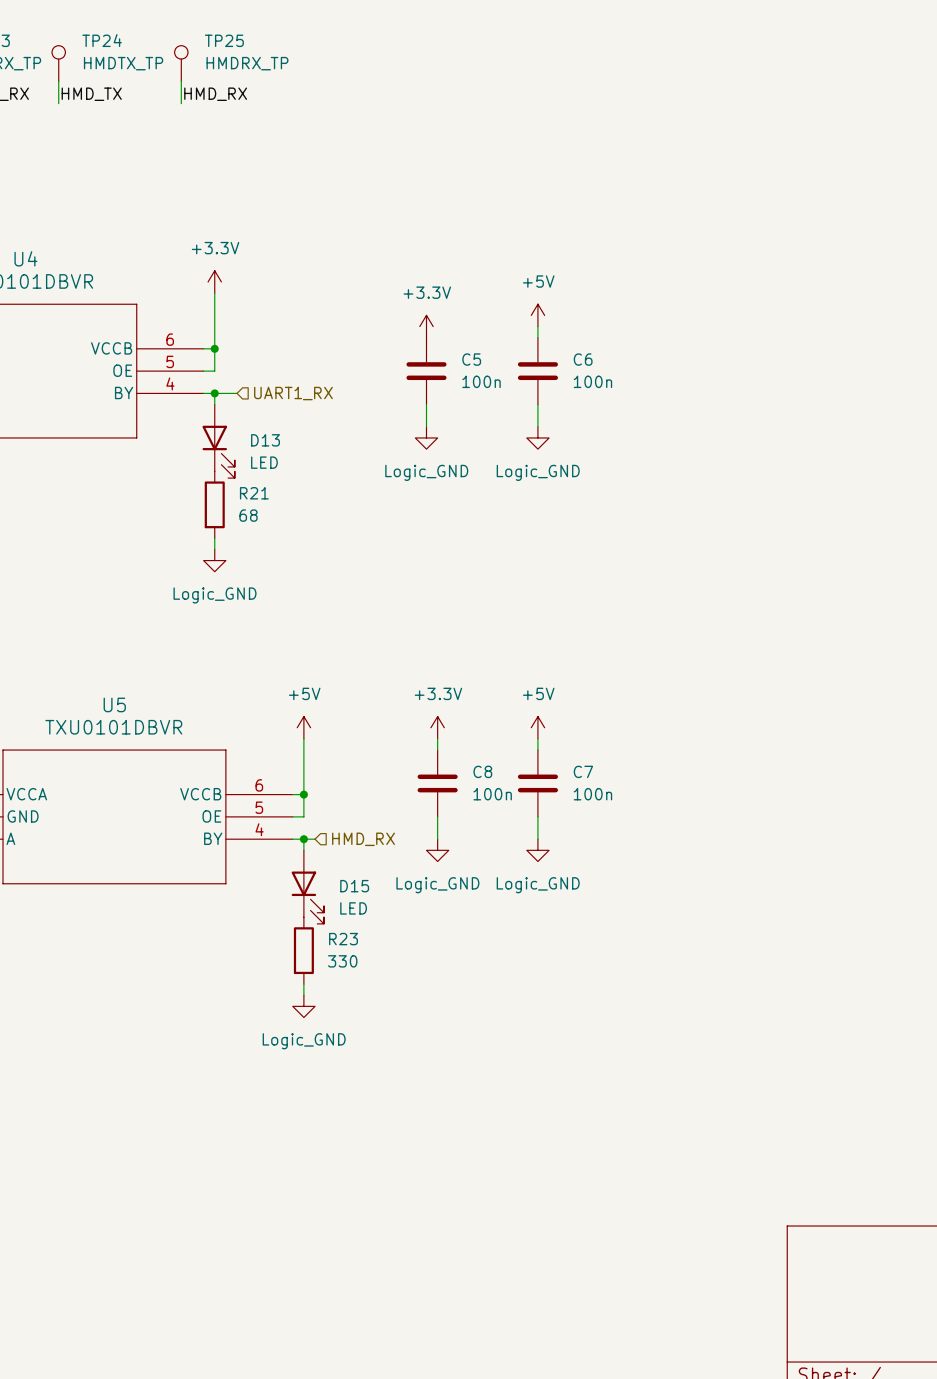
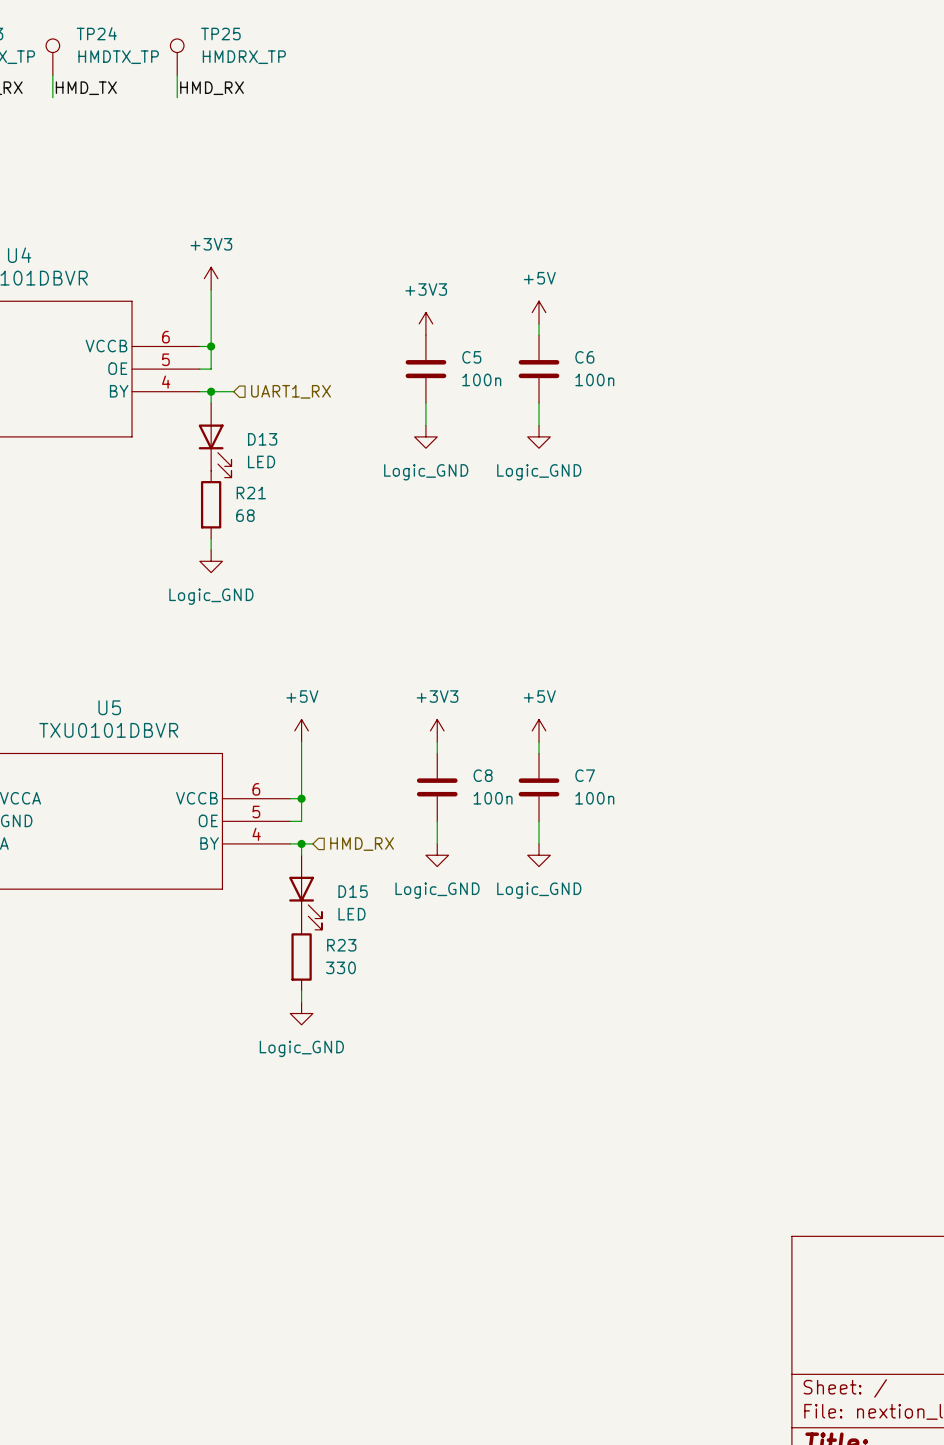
power symbol: +3.3V (214, 281) -> +3V3 (211, 278)
power symbol: +3.3V (426, 326) -> +3V3 (425, 323)
power symbol: +3.3V (437, 727) -> +3V3 (437, 730)

